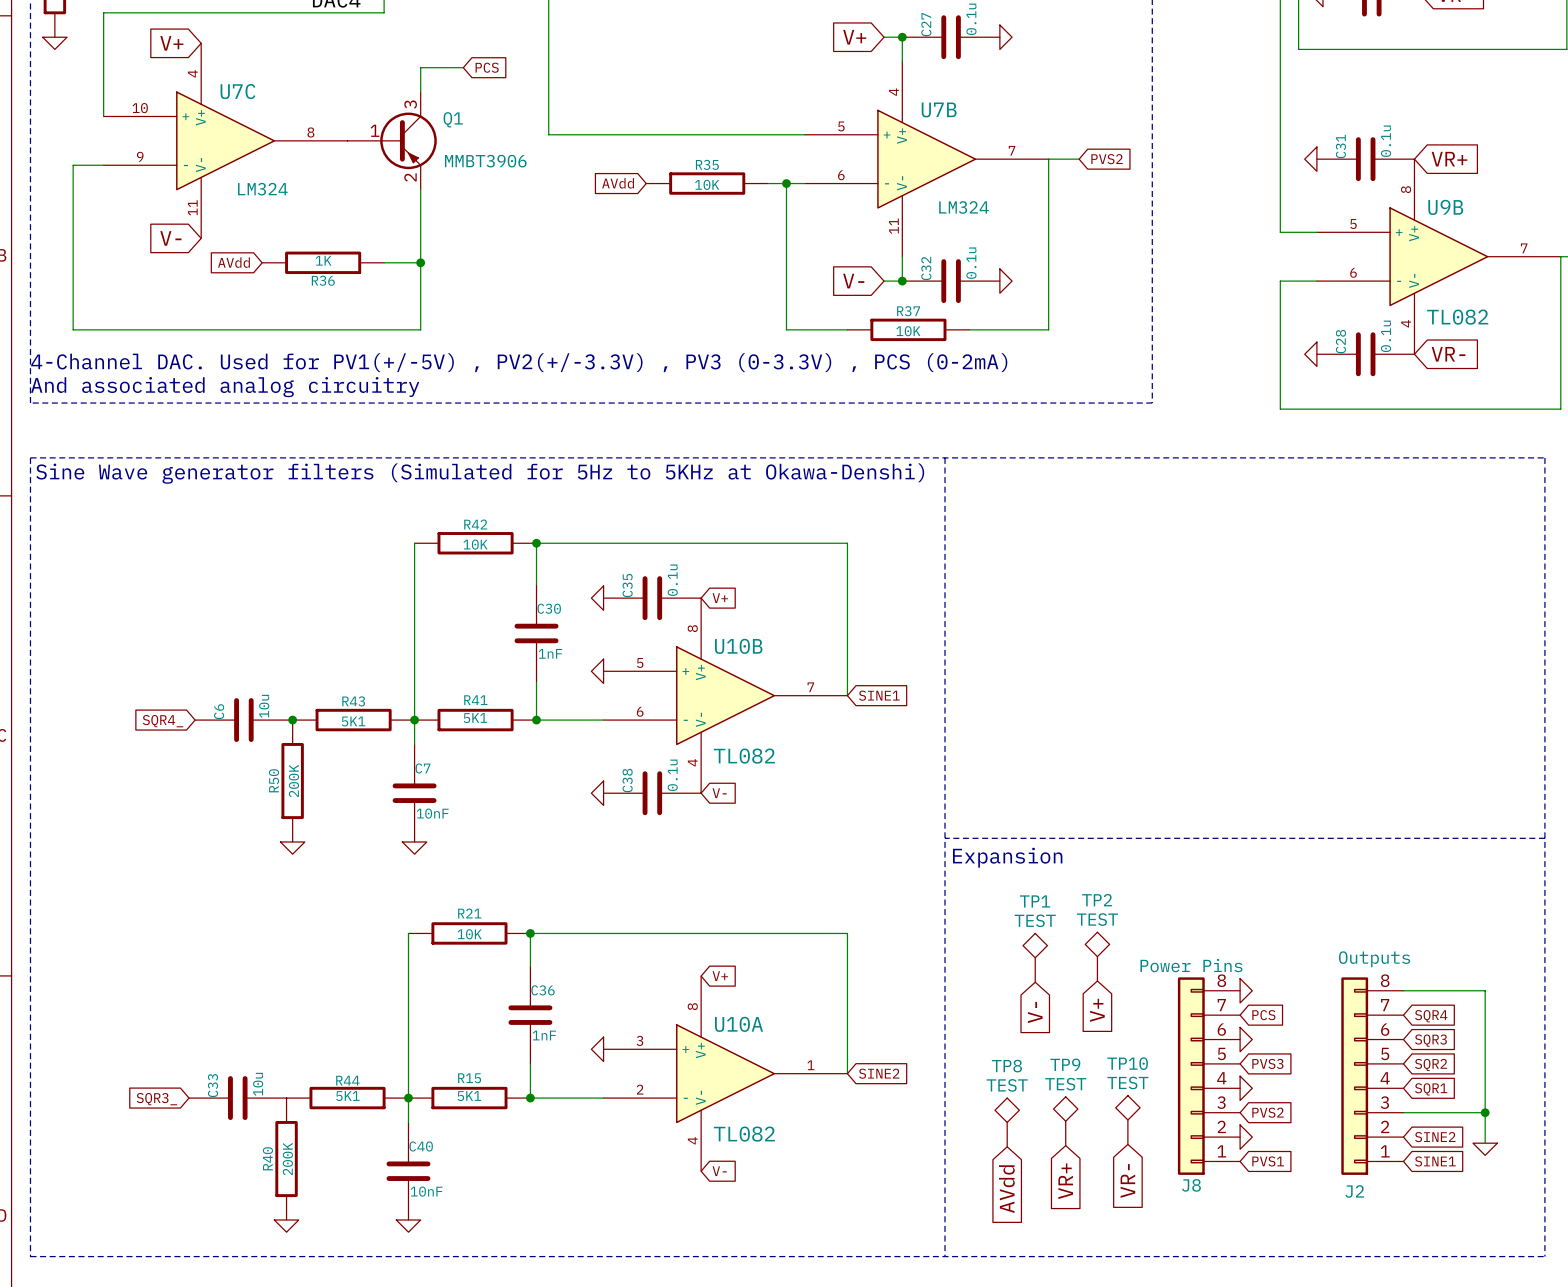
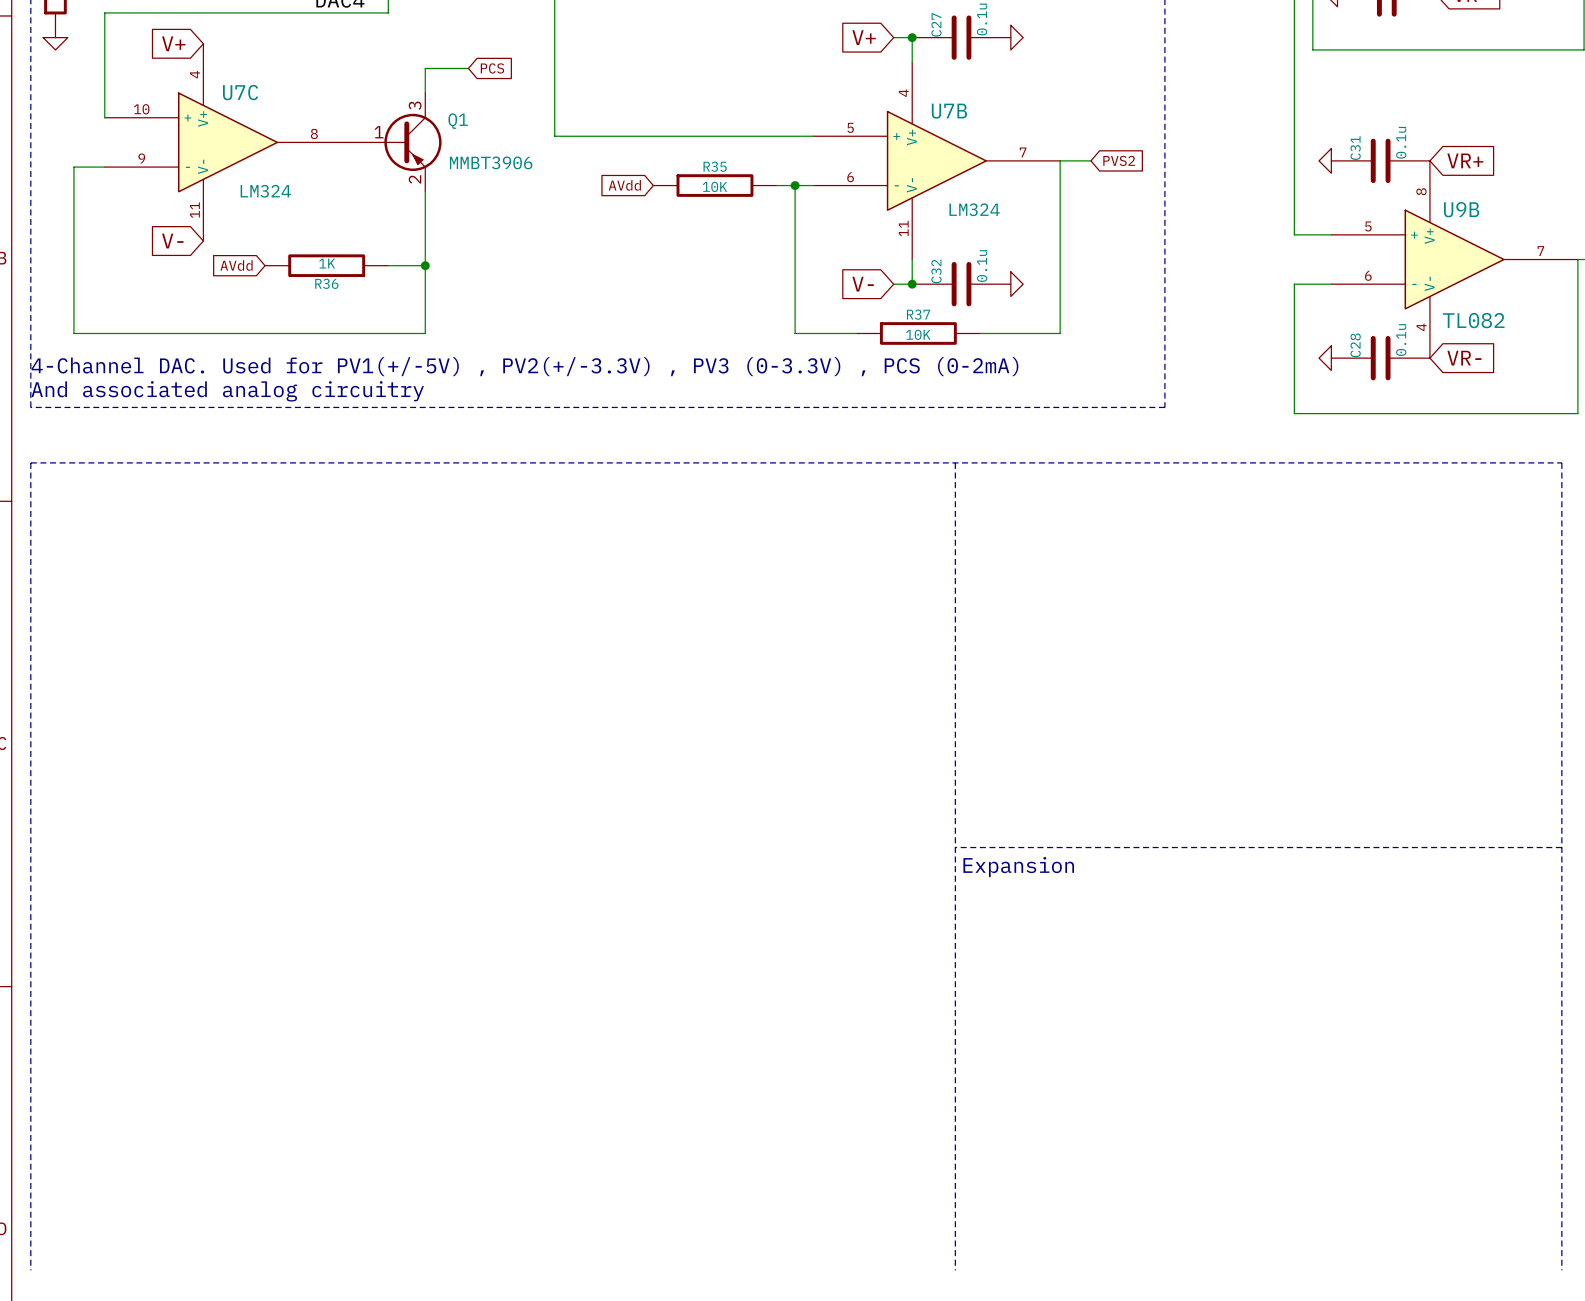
text: Sine Wave generator filters (Simulated for 5Hz to 5KHz at Okawa-Denshi) (480, 473) -> none
wire: (414, 543) (414, 744) -> none
R42: 10K (475, 543) -> none
junction: (536, 543) -> none
wire: (536, 584) (536, 543) (847, 543) (847, 695) -> none
power symbol: (597, 598) -> none
C35: 0.1u (652, 598) -> none
global label: V+ (720, 598) -> none
C30: 1nF (536, 633) -> none
power symbol: (597, 671) -> none
wire: (536, 682) (536, 720) (603, 720) -> none
U10B: TL082 (725, 695) -> none
global label: SINE1 (879, 695) -> none
C6: 10u (243, 720) -> none
junction: (292, 720) -> none
R43: 5K1 (353, 720) -> none
junction: (414, 720) -> none
R41: 5K1 (475, 720) -> none
junction: (536, 720) -> none
global label: SQR4_ (163, 721) -> none
R50: 200K (292, 781) -> none
C7: 10nF (414, 793) -> none
power symbol: (597, 793) -> none
C38: 0.1u (652, 793) -> none
global label: V- (719, 793) -> none
power symbol: (292, 848) -> none
power symbol: (414, 848) -> none
wire: (408, 933) (408, 1122) -> none
R21: 10K (469, 933) -> none
junction: (530, 933) -> none
TP2: TEST (1097, 956) -> none
TP1: TEST (1035, 957) -> none
wire: (530, 966) (530, 933) (847, 933) (847, 1073) -> none
global label: V+ (720, 976) -> none
power symbol: (1246, 990) -> none
wire: (1403, 990) (1485, 990) (1485, 1143) -> none
global label: V+ (1097, 1010) -> none
global label: V- (1035, 1012) -> none
C36: 1nF (530, 1015) -> none
global label: PCS (1263, 1015) -> none
global label: SQR4 (1431, 1016) -> none
power symbol: (1246, 1039) -> none
global label: SQR3 (1430, 1040) -> none
power symbol: (597, 1049) -> none
wire: (530, 1063) (530, 1098) (603, 1098) -> none
global label: PVS3 (1267, 1063) -> none
global label: SQR2 (1431, 1064) -> none
U10A: TL082 (725, 1073) -> none
global label: SINE2 (879, 1073) -> none
J8: Power Pins (1208, 1076) -> none
J2: Outputs (1372, 1076) -> none
power symbol: (1246, 1088) -> none
global label: SQR1 (1431, 1089) -> none
C33: 10u (237, 1098) -> none
R44: 5K1 (347, 1098) -> none
junction: (408, 1098) -> none
R15: 5K1 (469, 1098) -> none
junction: (530, 1098) -> none
global label: SQR3_ (156, 1099) -> none
global label: PVS2 (1268, 1112) -> none
wire: (1403, 1112) (1485, 1112) -> none
junction: (1485, 1112) -> none
TP10: TEST (1127, 1120) -> none
TP9: TEST (1065, 1121) -> none
TP8: TEST (1007, 1122) -> none
power symbol: (1246, 1137) -> none
global label: SINE2 (1435, 1137) -> none
power symbol: (1485, 1149) -> none
R40: 200K (286, 1159) -> none
global label: PVS1 (1268, 1161) -> none
global label: SINE1 (1435, 1161) -> none
C40: 10nF (408, 1171) -> none
global label: V- (719, 1171) -> none
global label: VR- (1127, 1180) -> none
global label: VR+ (1065, 1181) -> none
global label: AVdd (1006, 1189) -> none
power symbol: (286, 1226) -> none
power symbol: (408, 1226) -> none
line: (30, 1256) (1544, 1256) -> none

